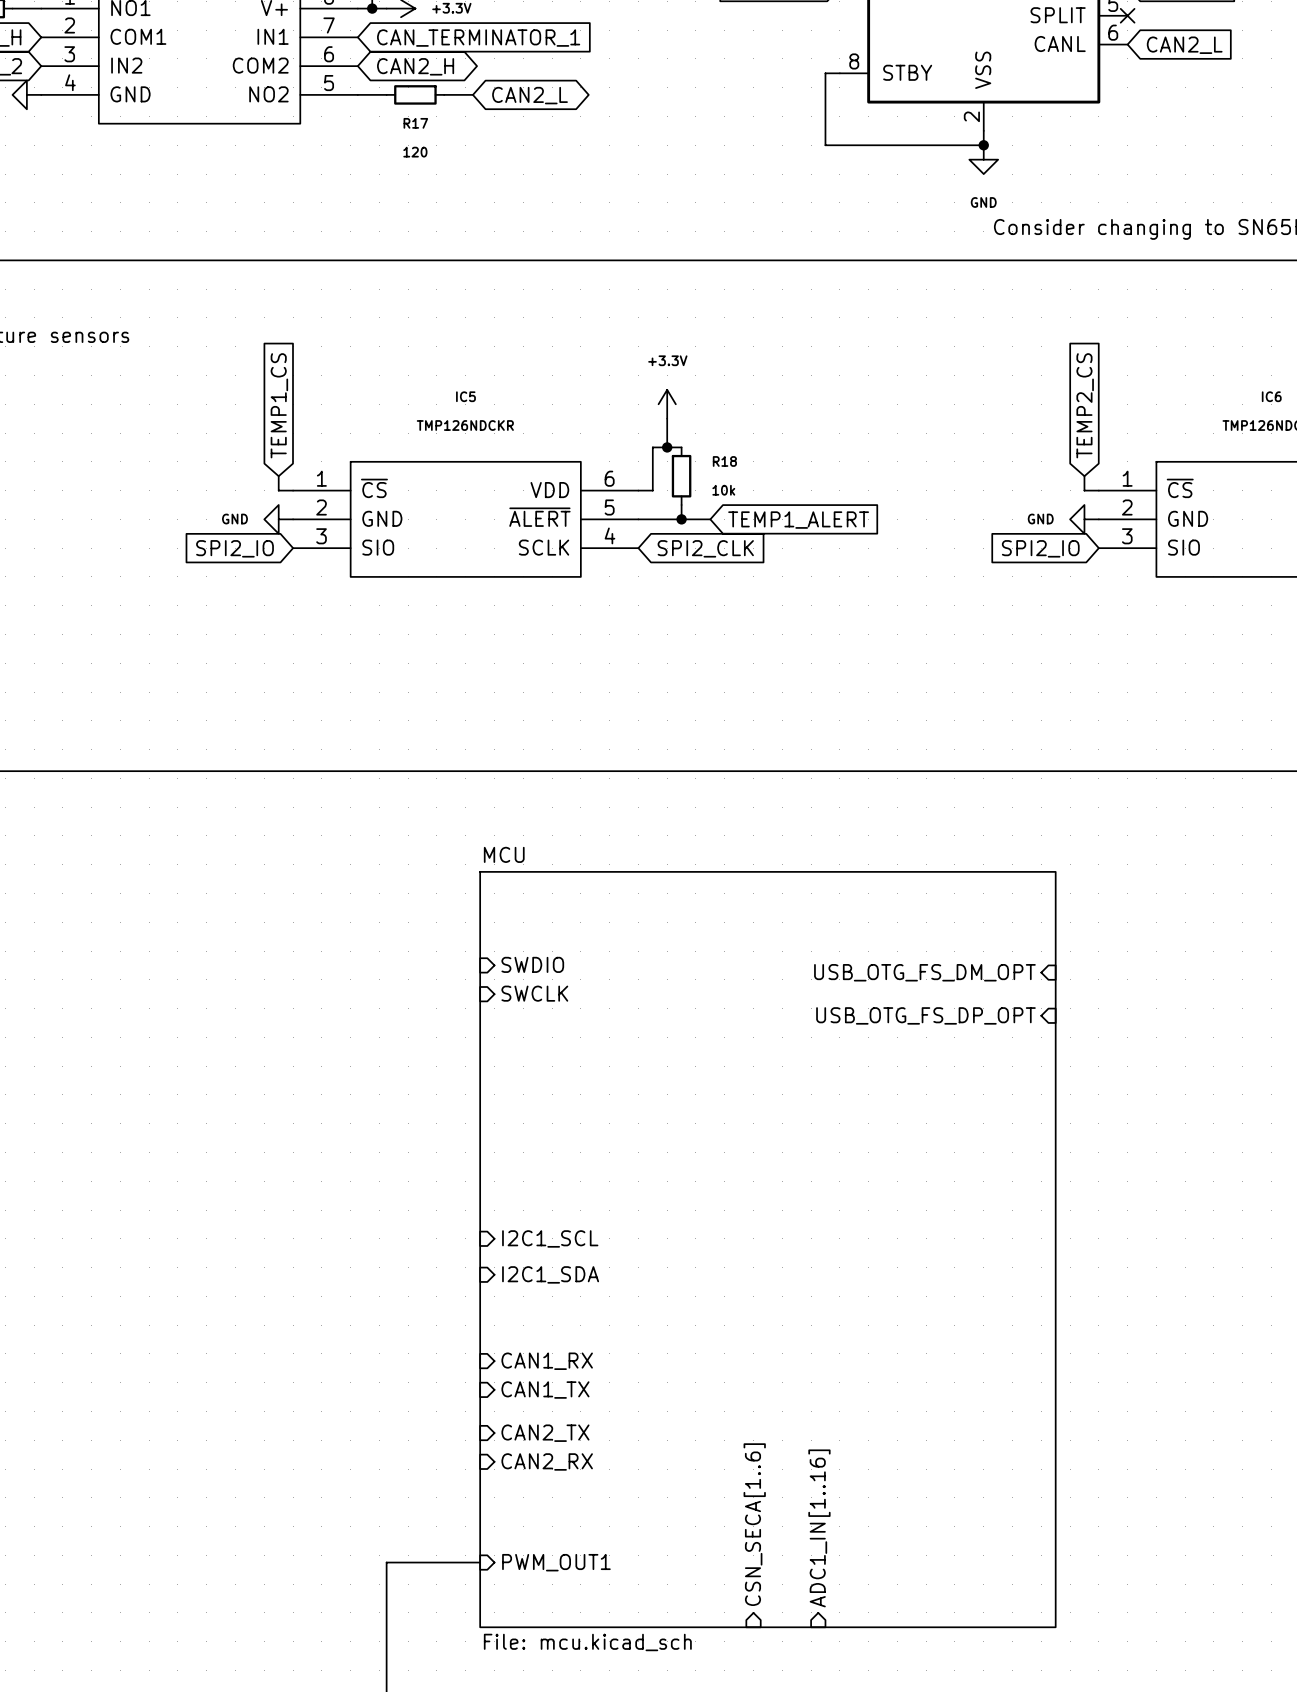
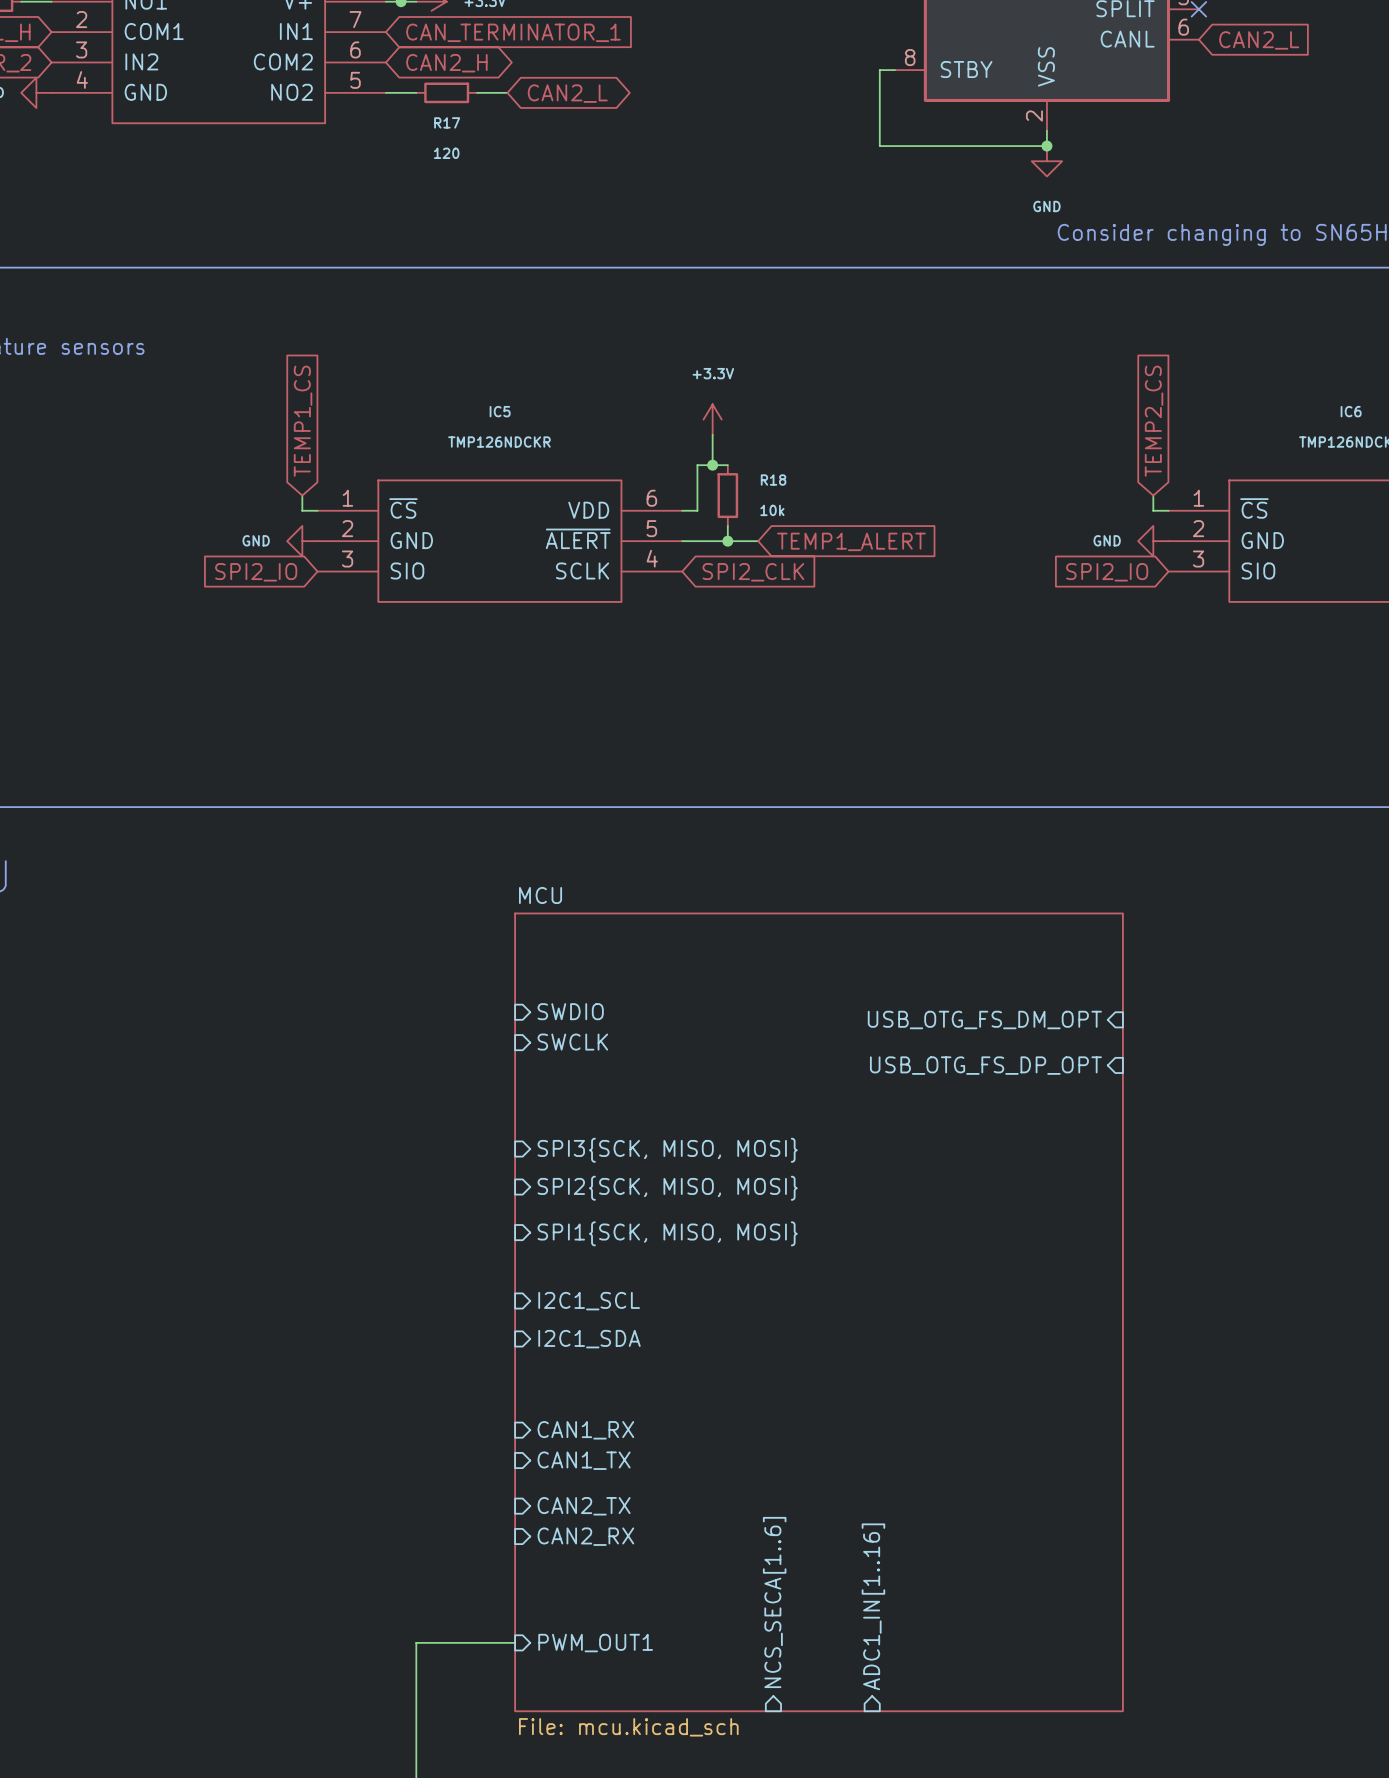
sheet pin: none -> SPI3{SCK, MISO, MOSI} (667, 1150)
sheet pin: none -> SPI2{SCK, MISO, MOSI} (667, 1188)
sheet pin: none -> SPI1{SCK, MISO, MOSI} (667, 1233)
sheet pin: CSN_SECA[1..6] (754, 1524) -> NCS_SECA[1..6] (774, 1602)

